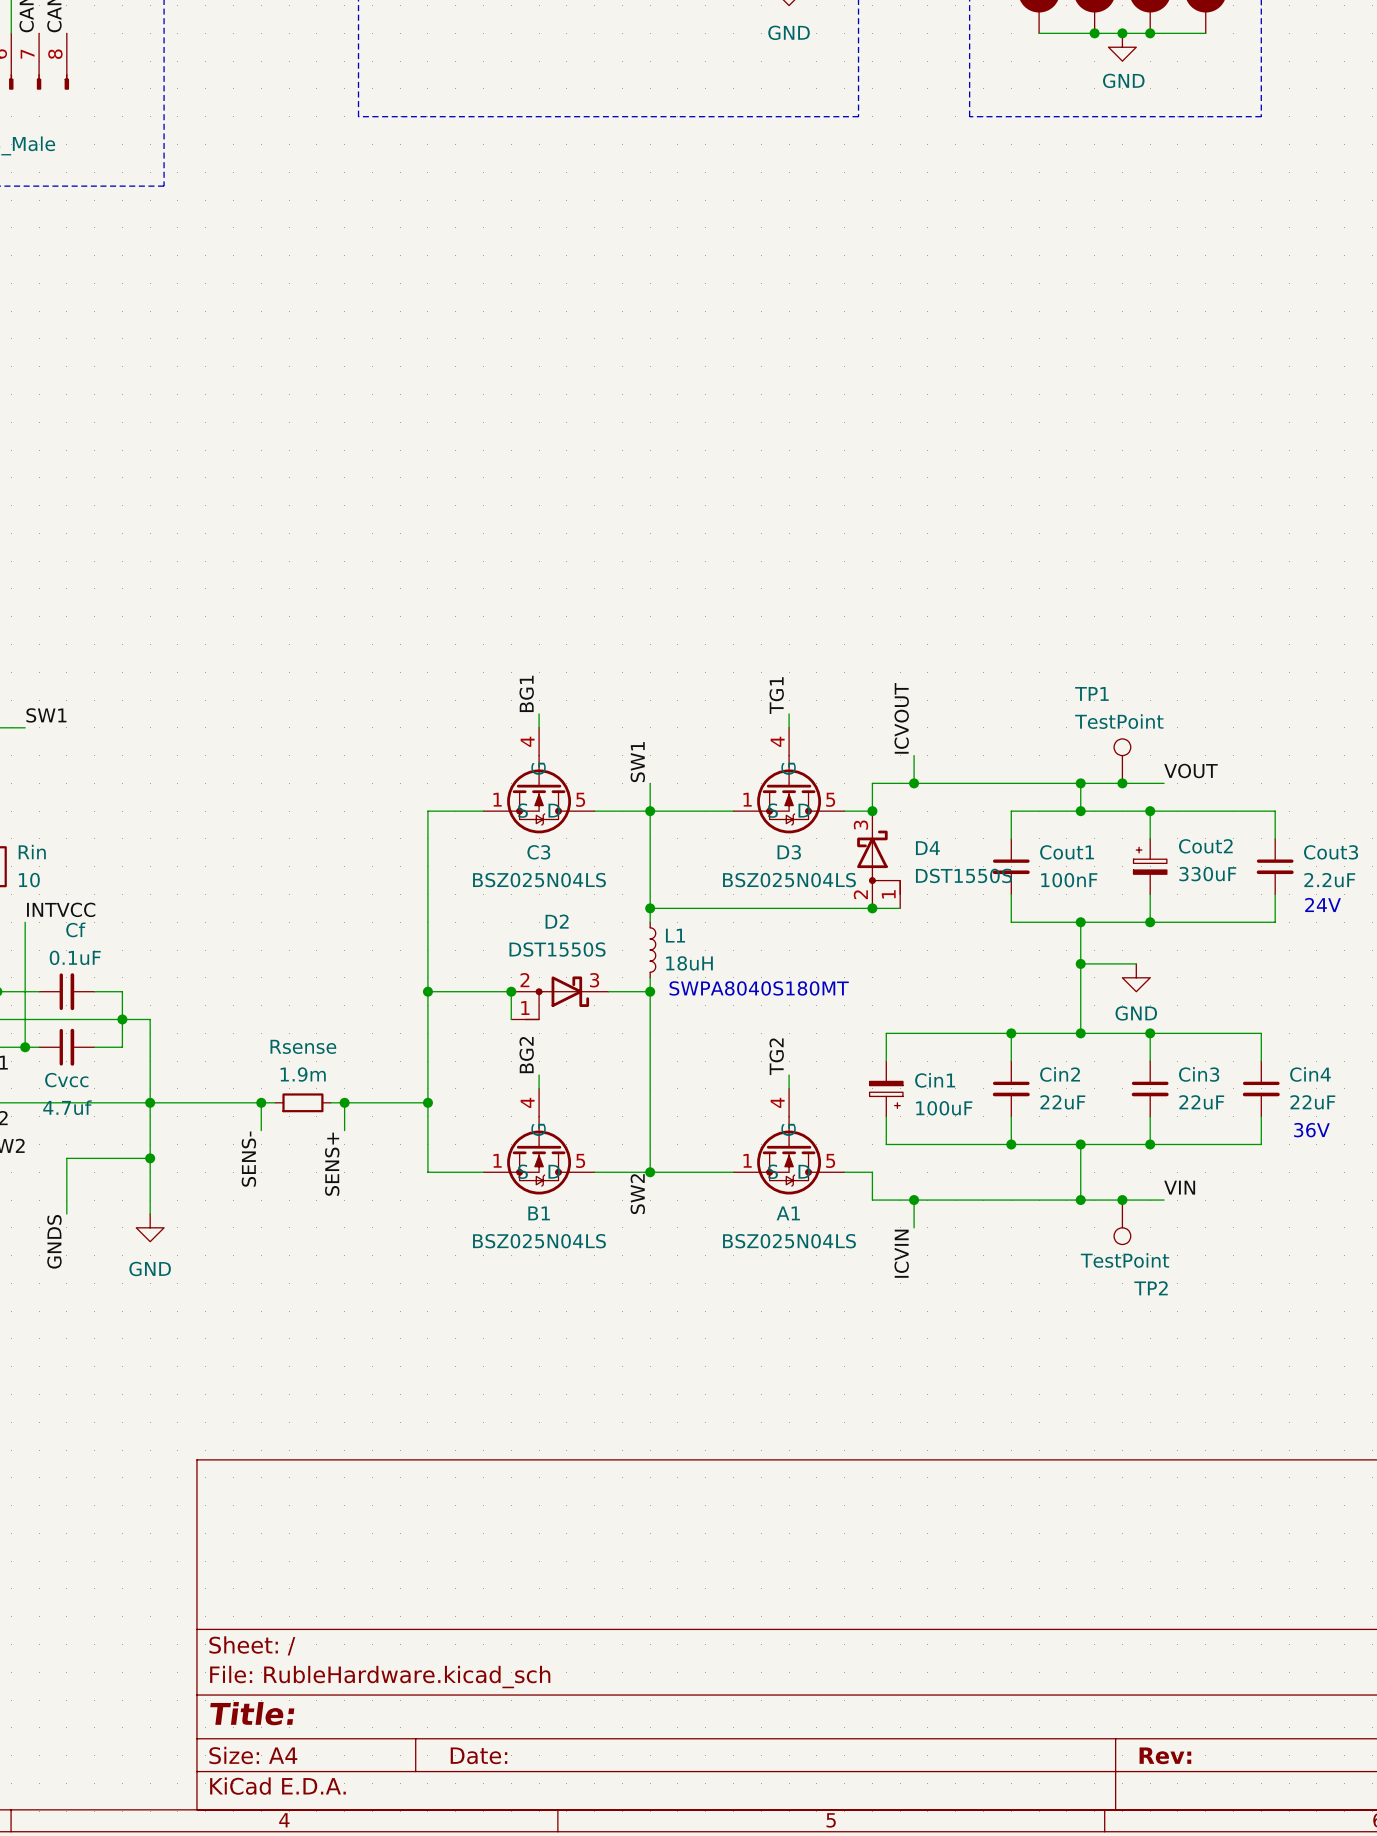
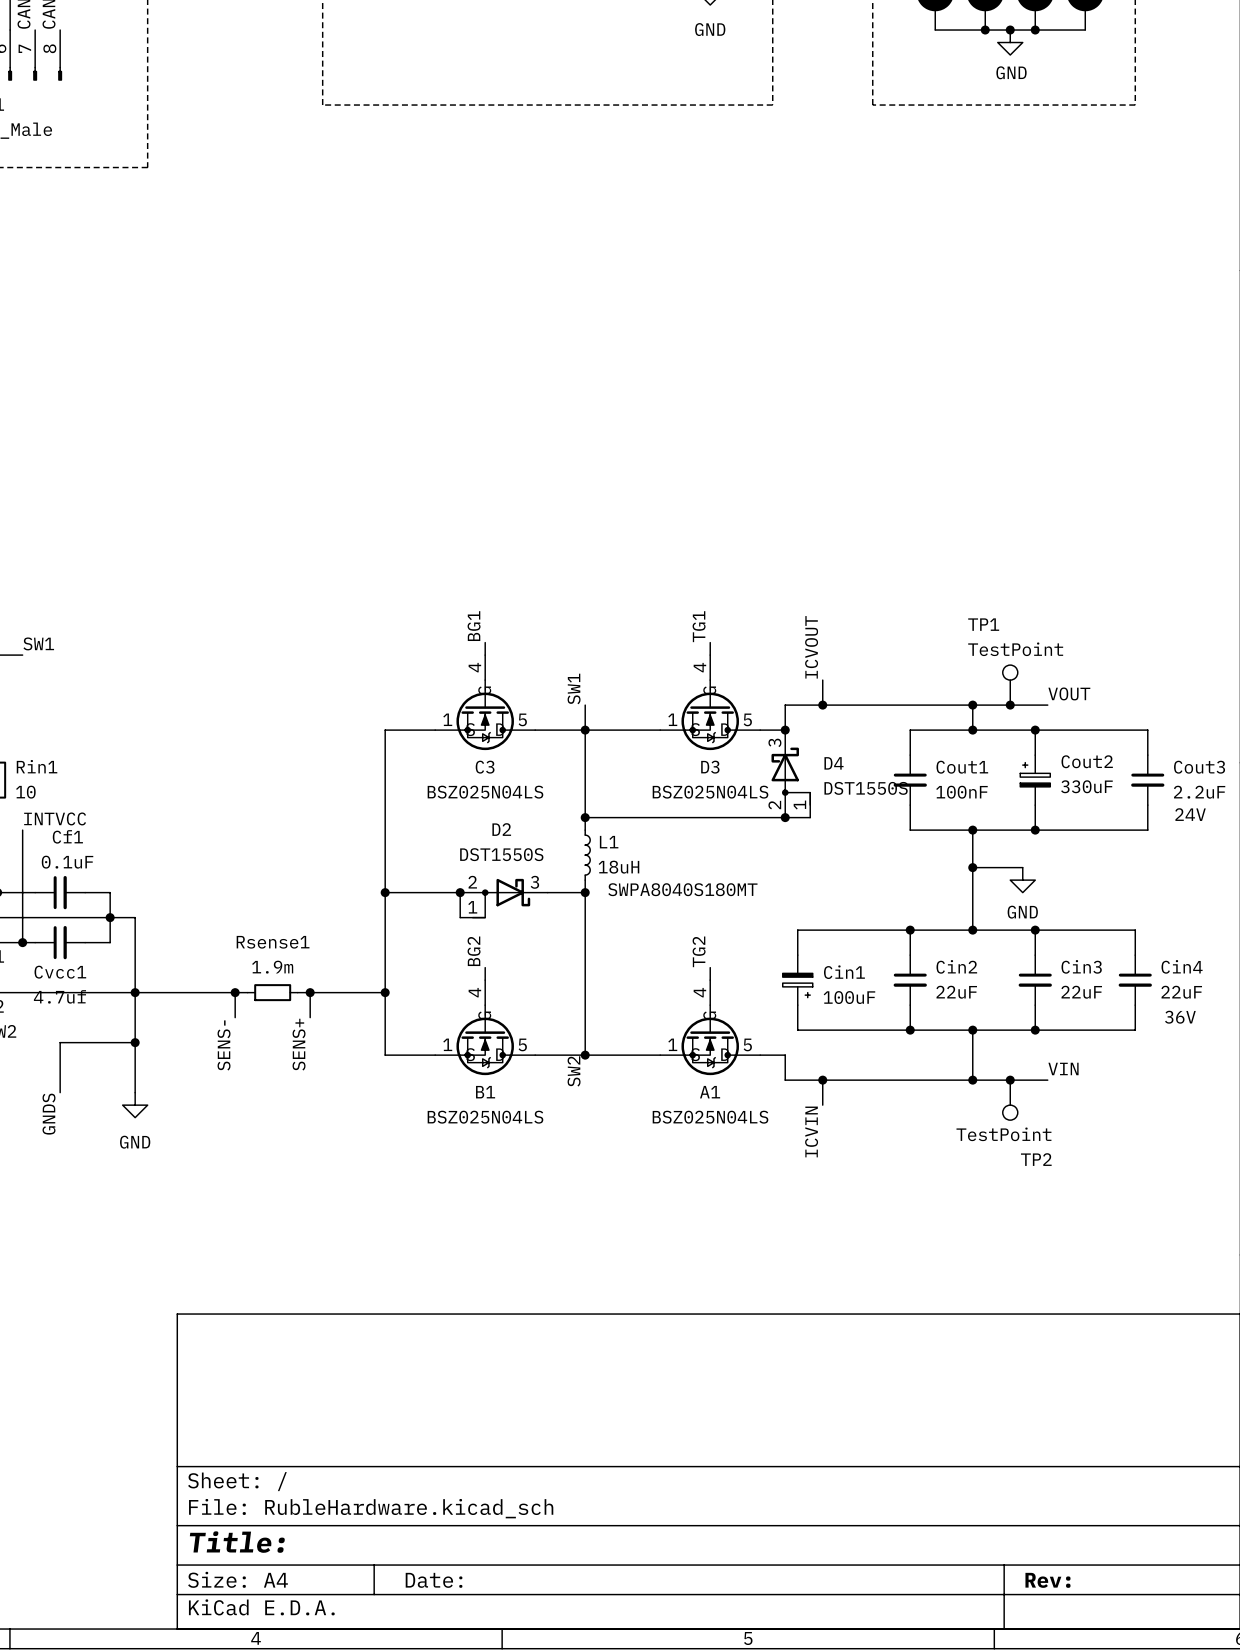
Rin name: Rin (32, 852) -> Rin1 (37, 766)
Cf name: Cf (75, 929) -> Cf1 (67, 836)
Rsense name: Rsense (303, 1046) -> Rsense1 (273, 942)
Cvcc name: Cvcc (66, 1080) -> Cvcc1 (60, 972)

